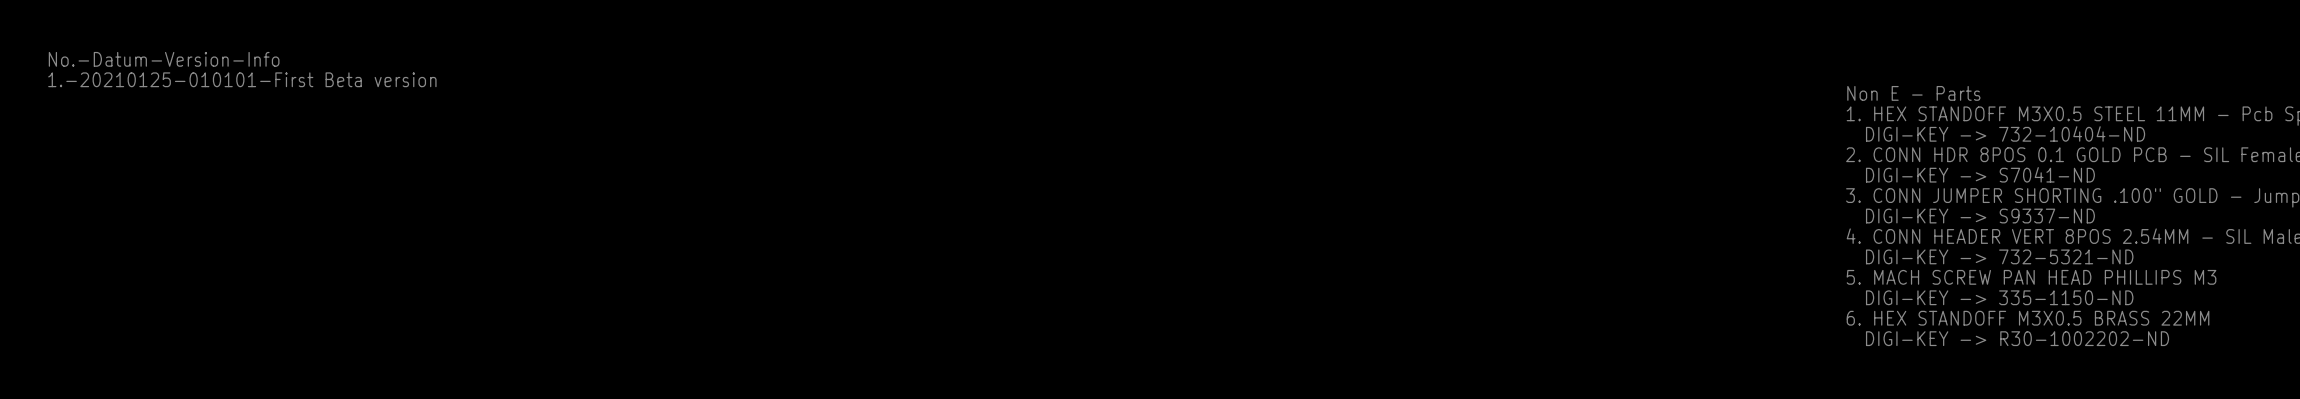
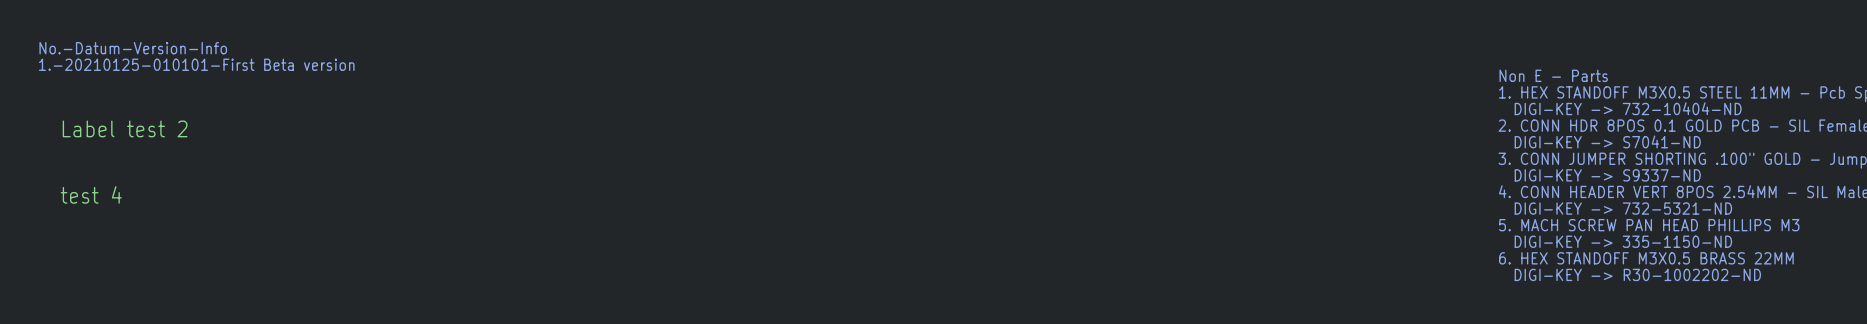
text: none -> Label test 2 (125, 128)
text: none -> test 4 (91, 194)

